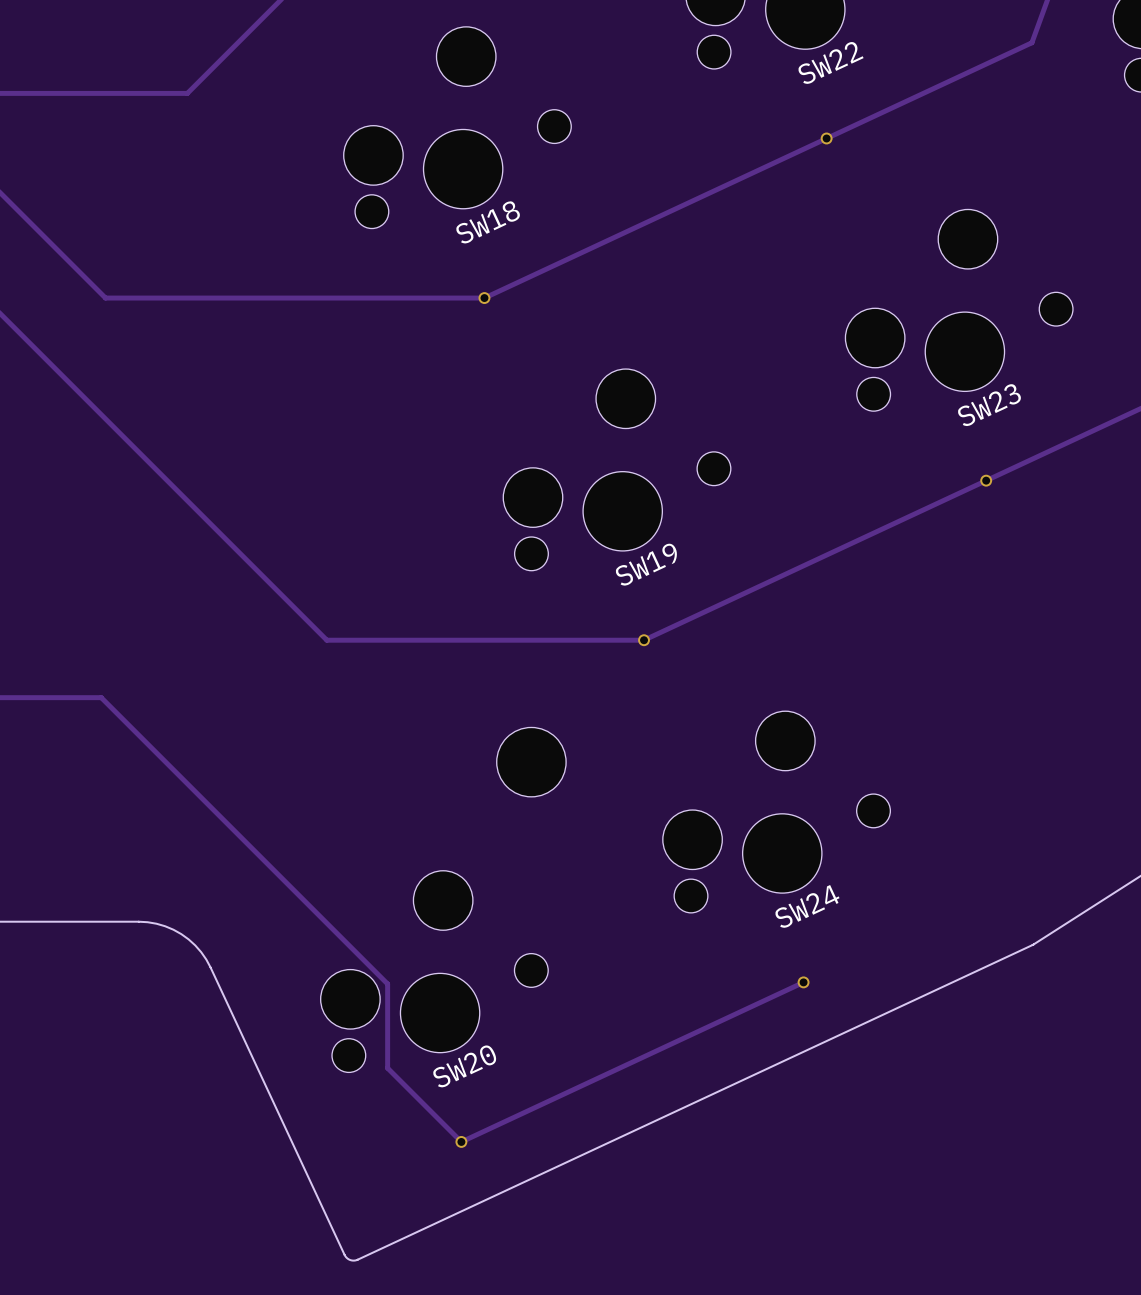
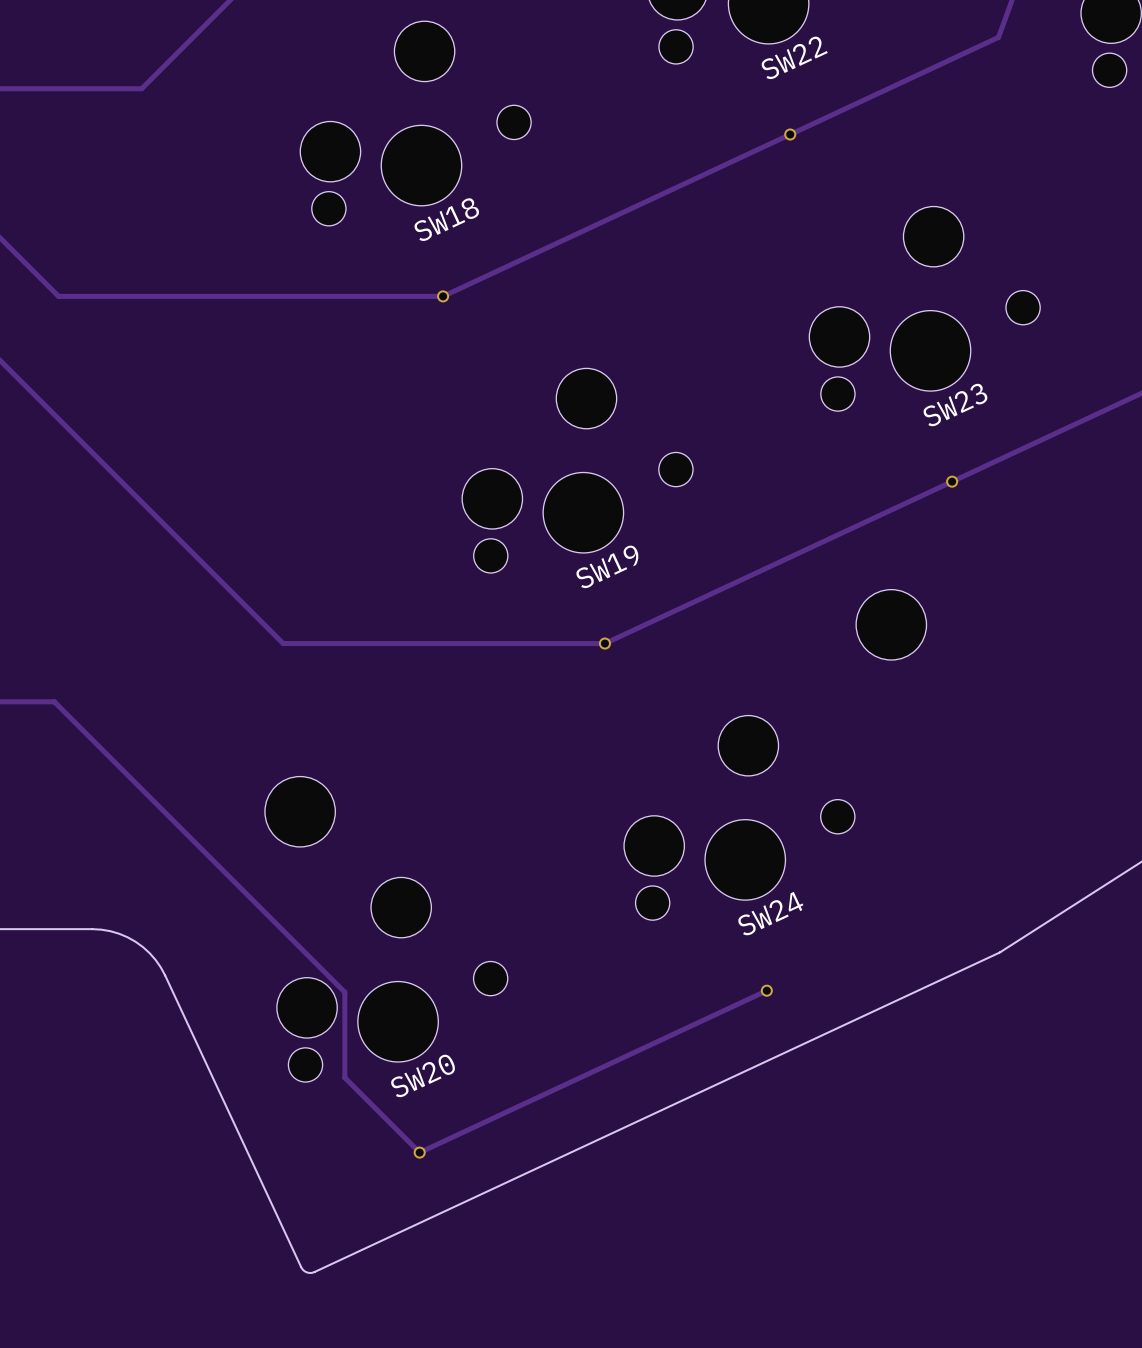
part: none -> (891, 624)
part position: (531, 762) -> (300, 811)

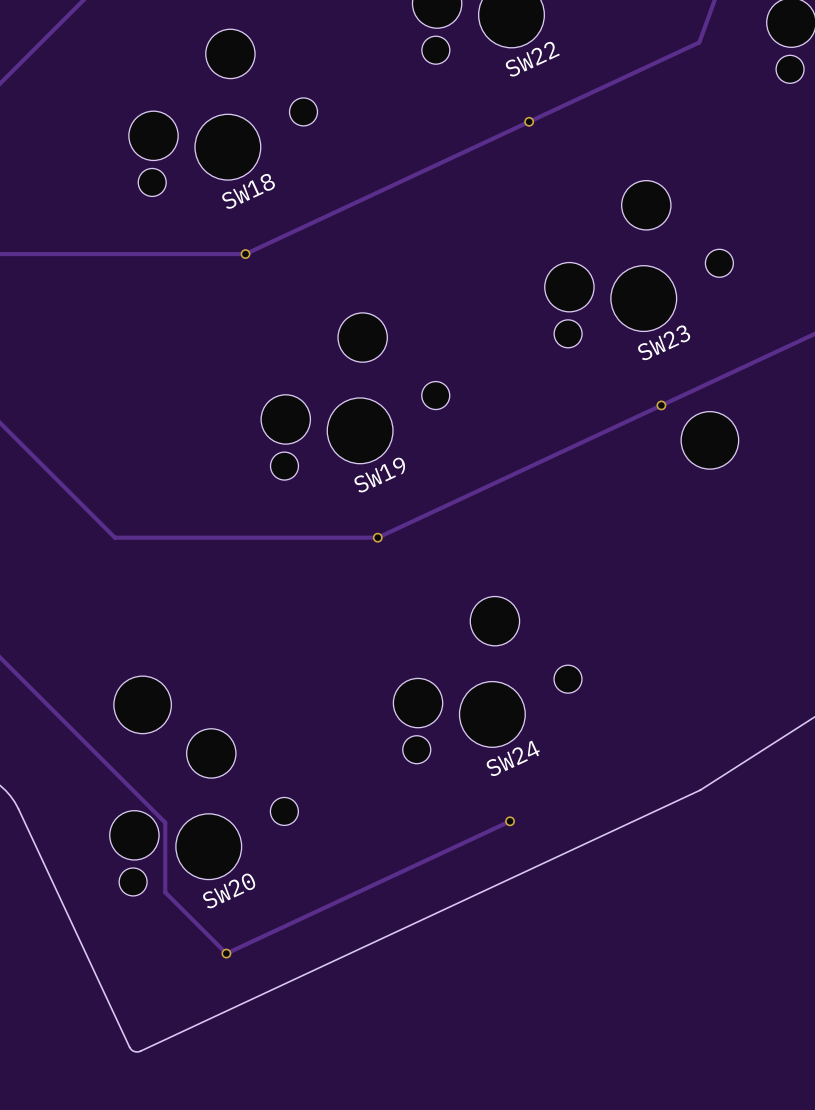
part position: (891, 624) -> (709, 440)
part position: (300, 811) -> (142, 704)

